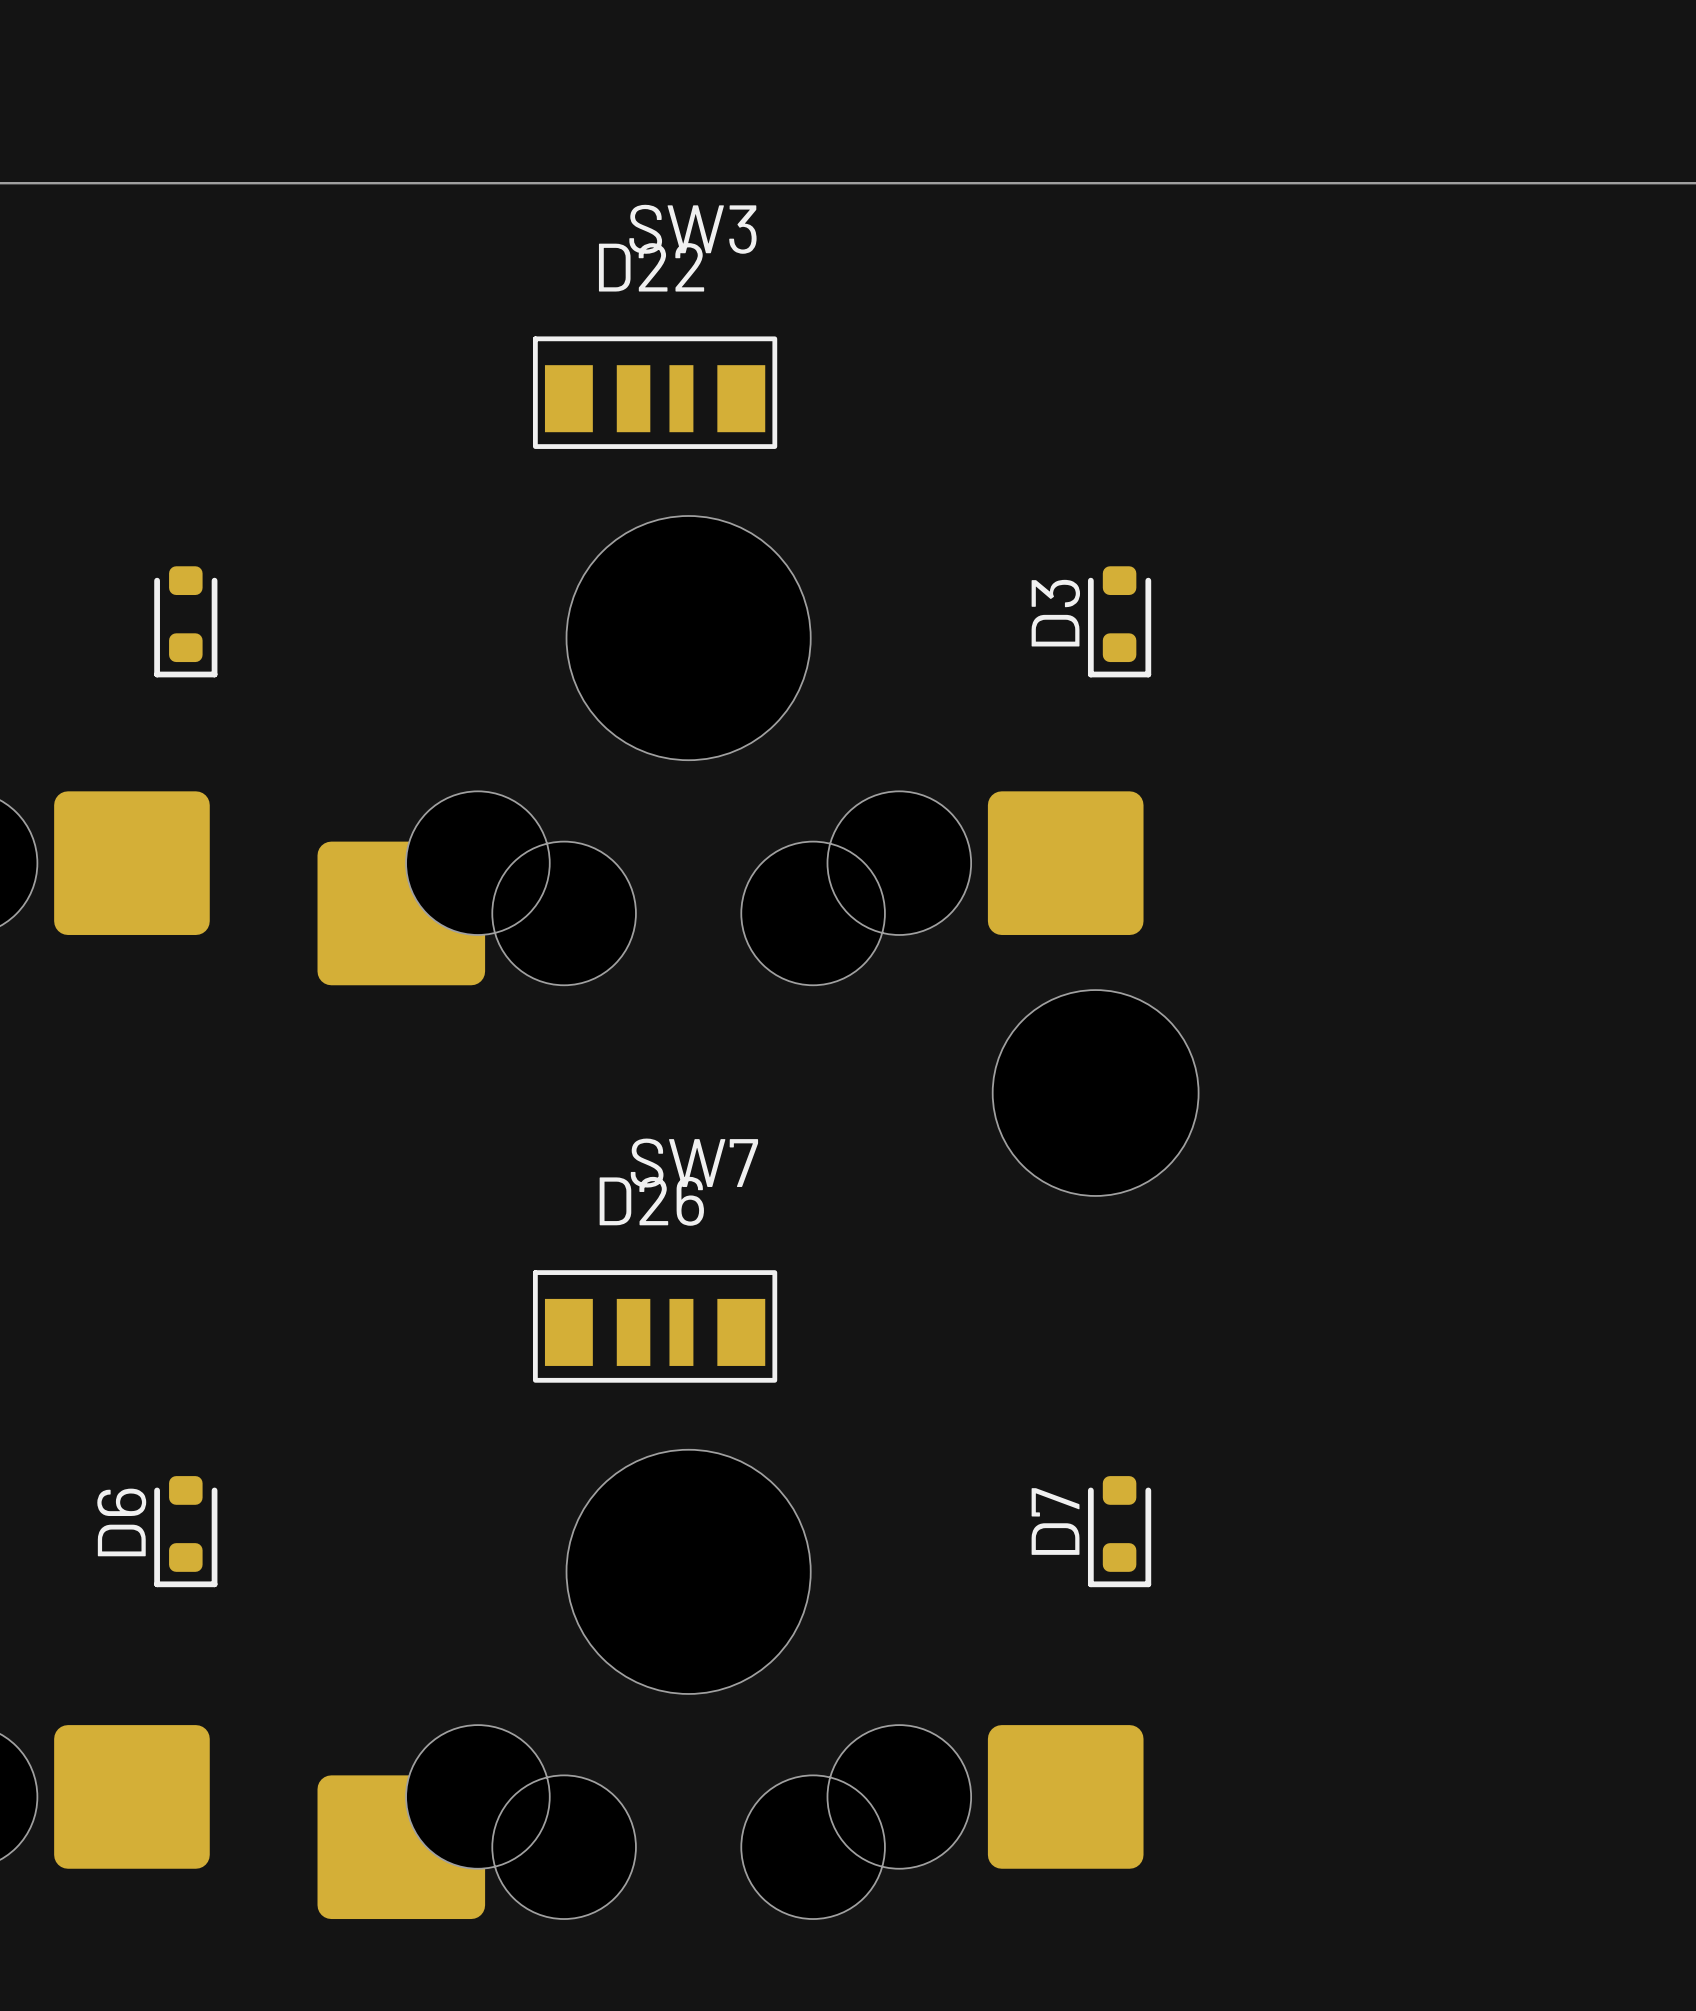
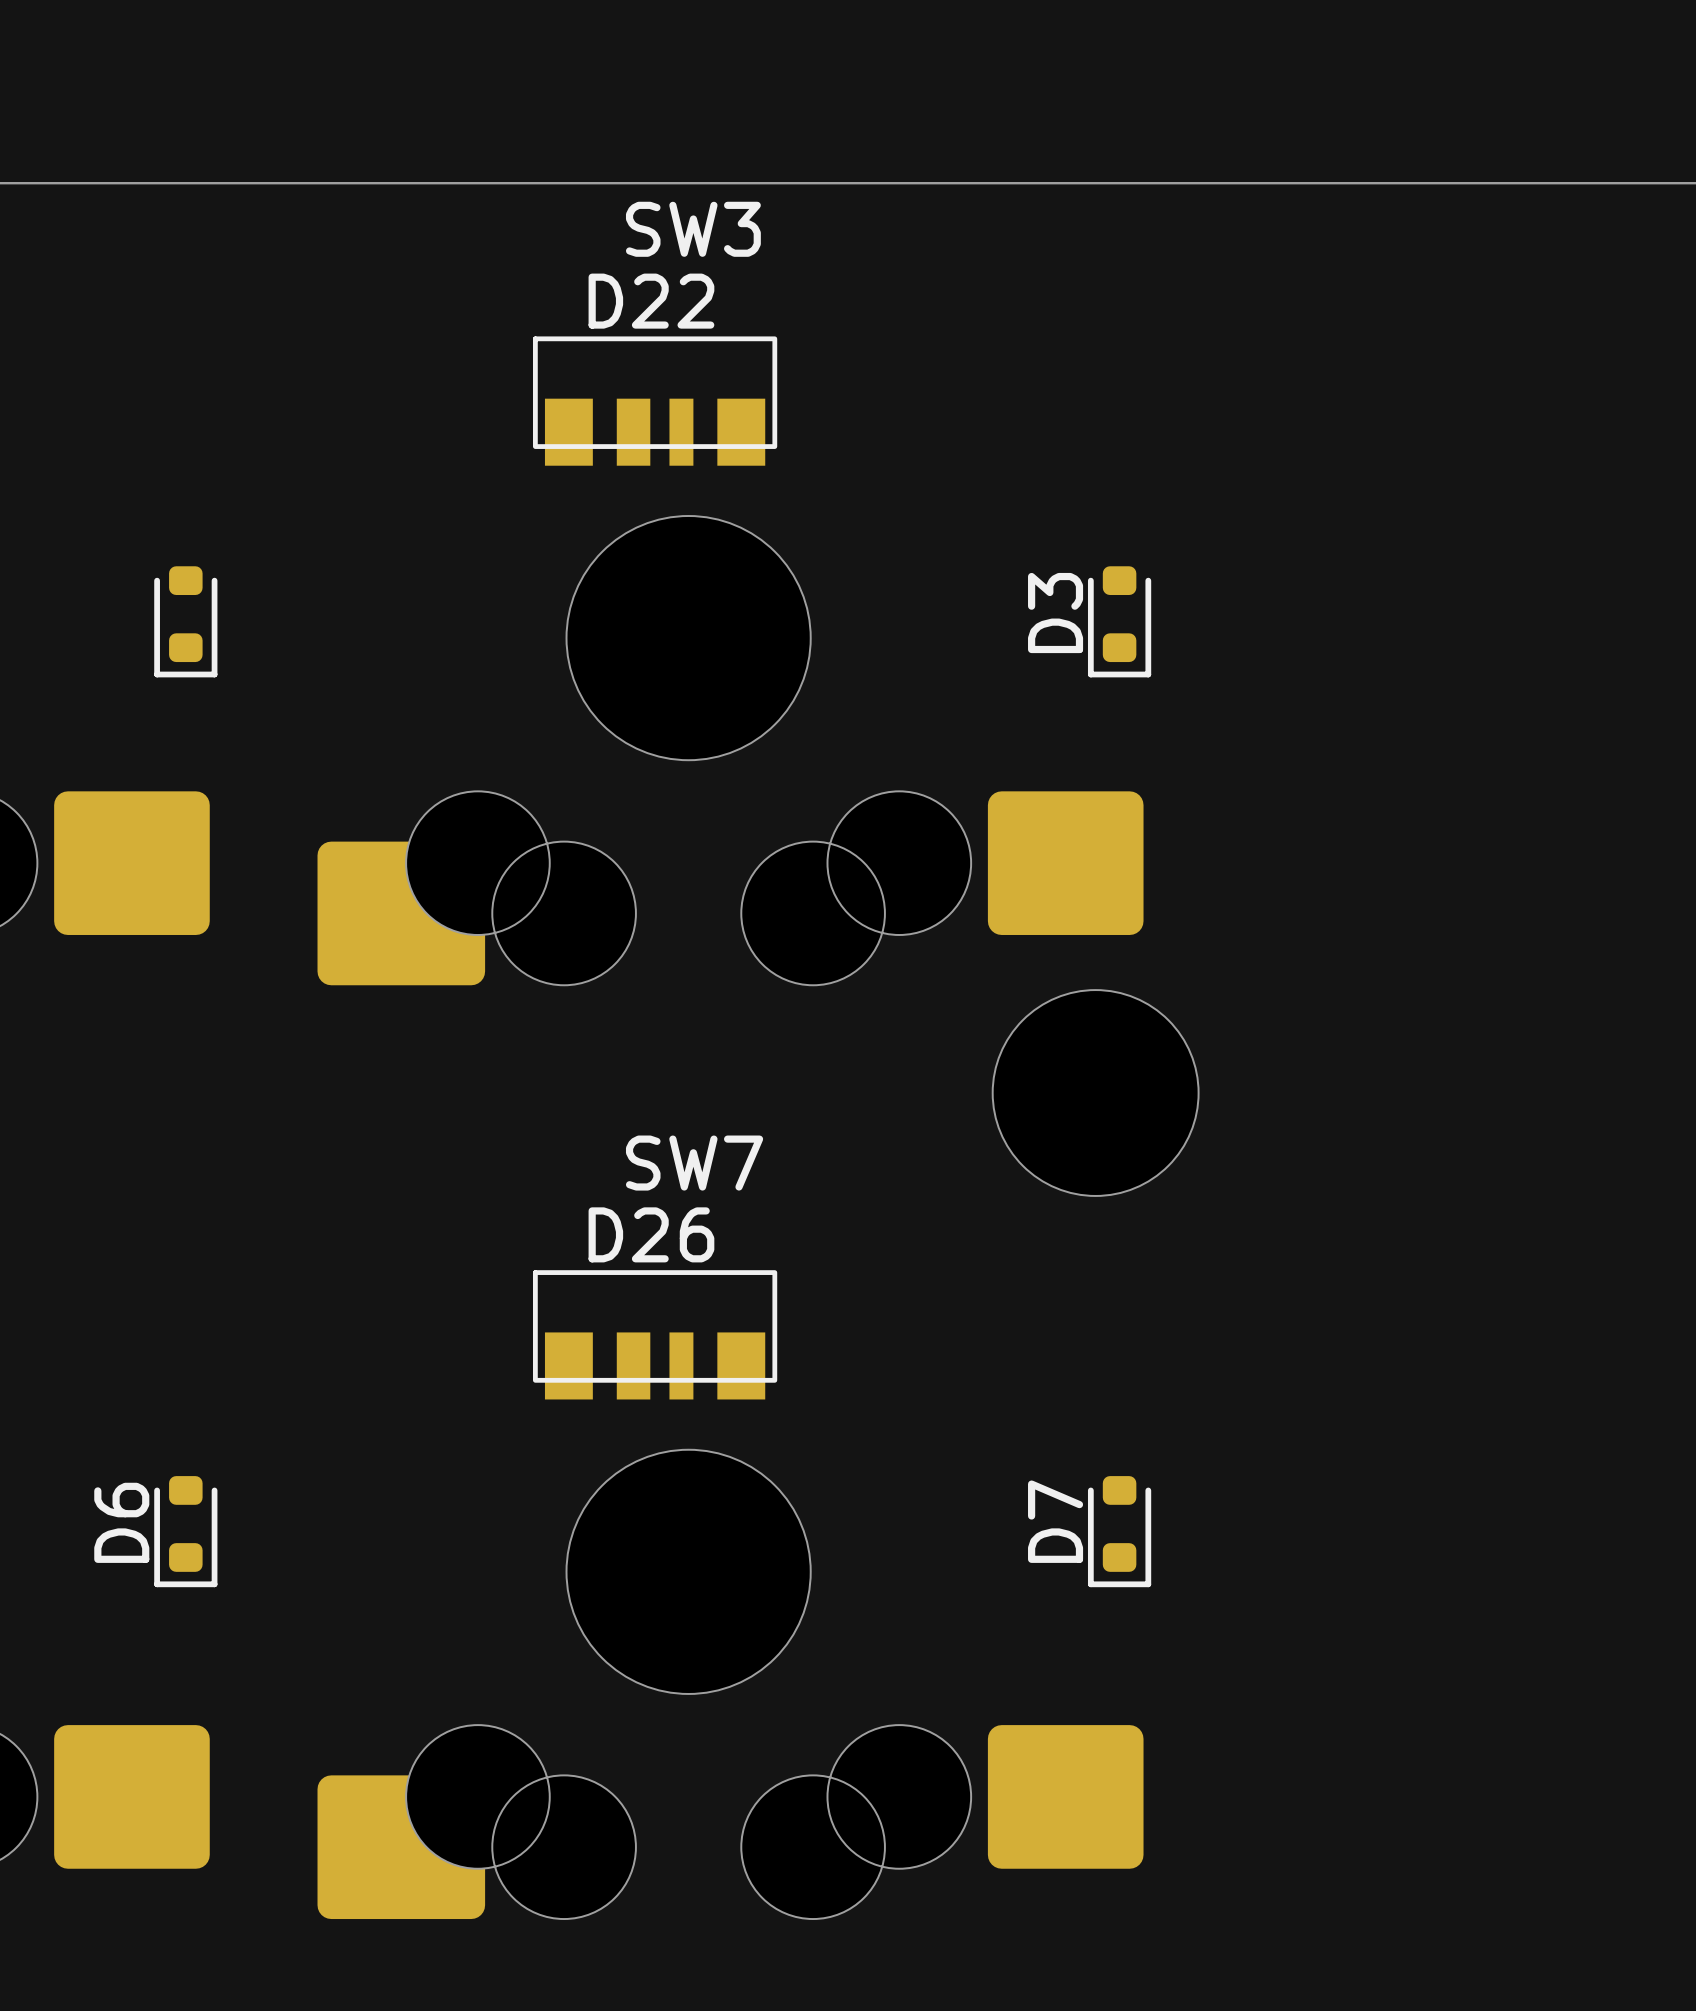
D22 position: (655, 398) -> (655, 432)
D26 position: (655, 1332) -> (655, 1365)

